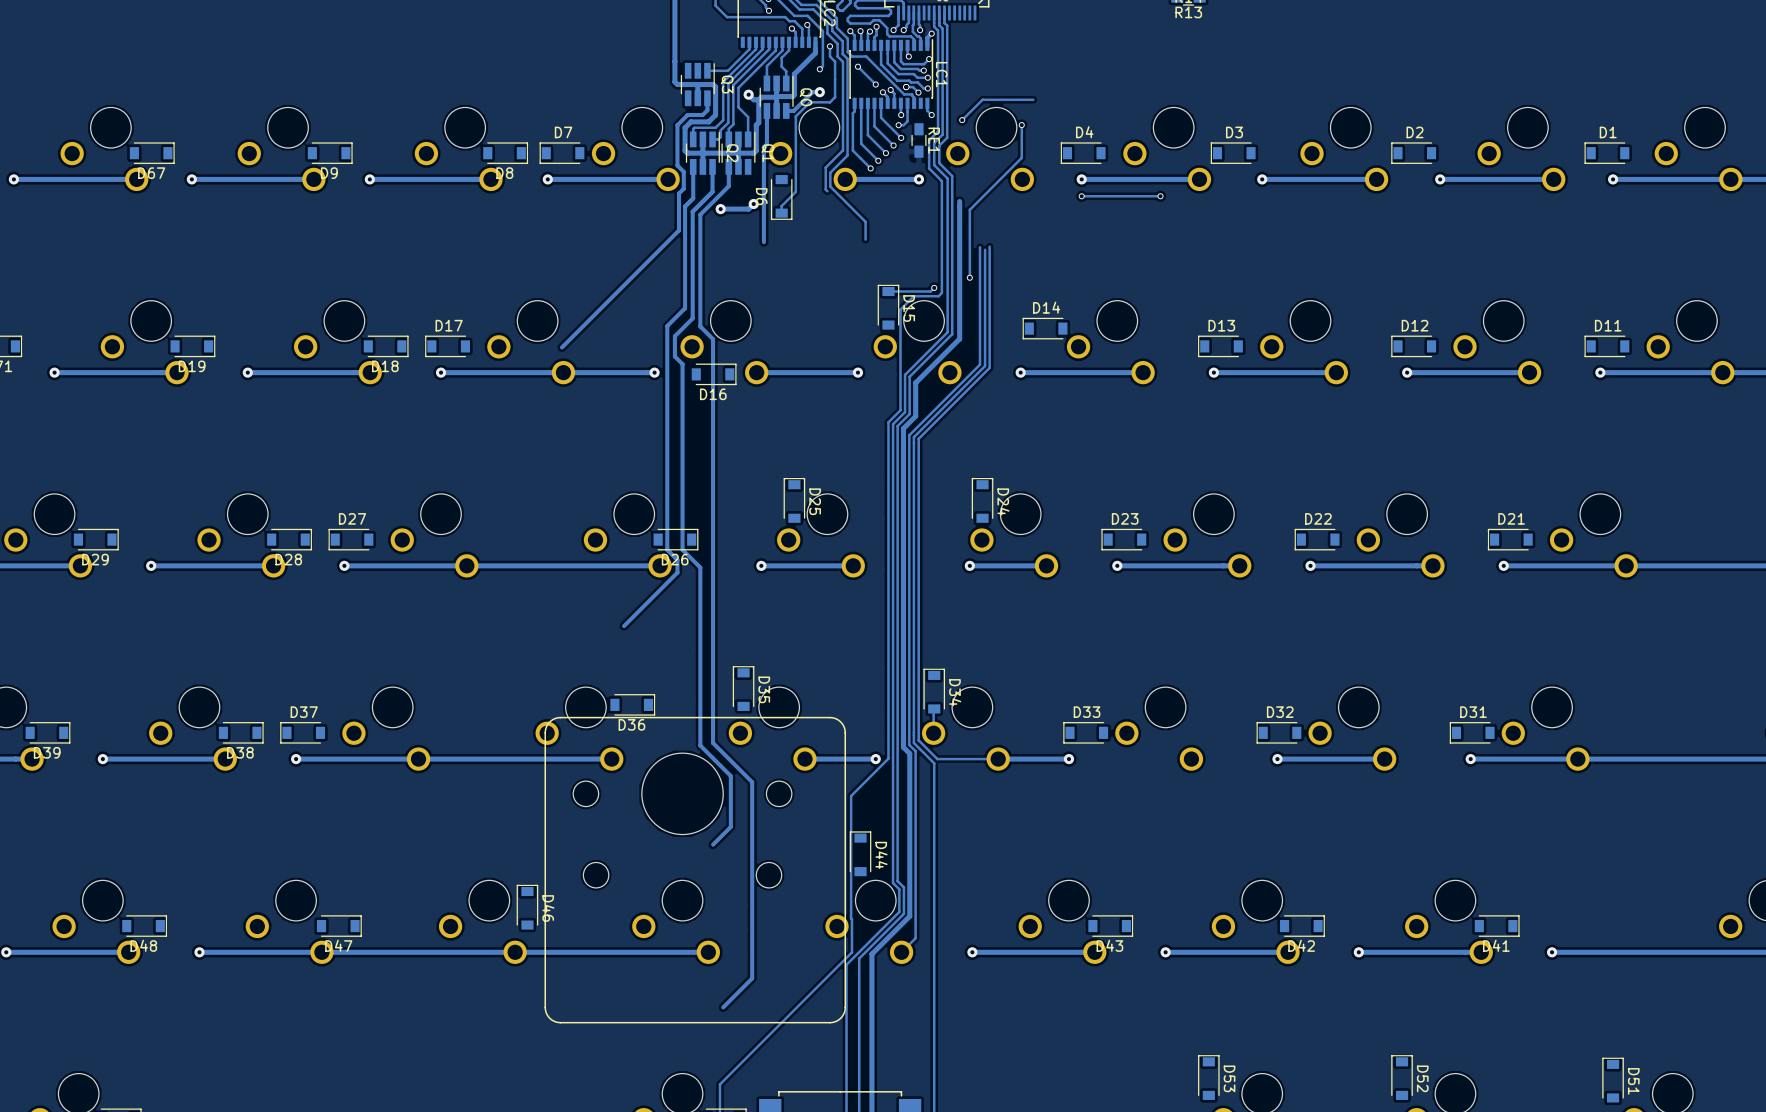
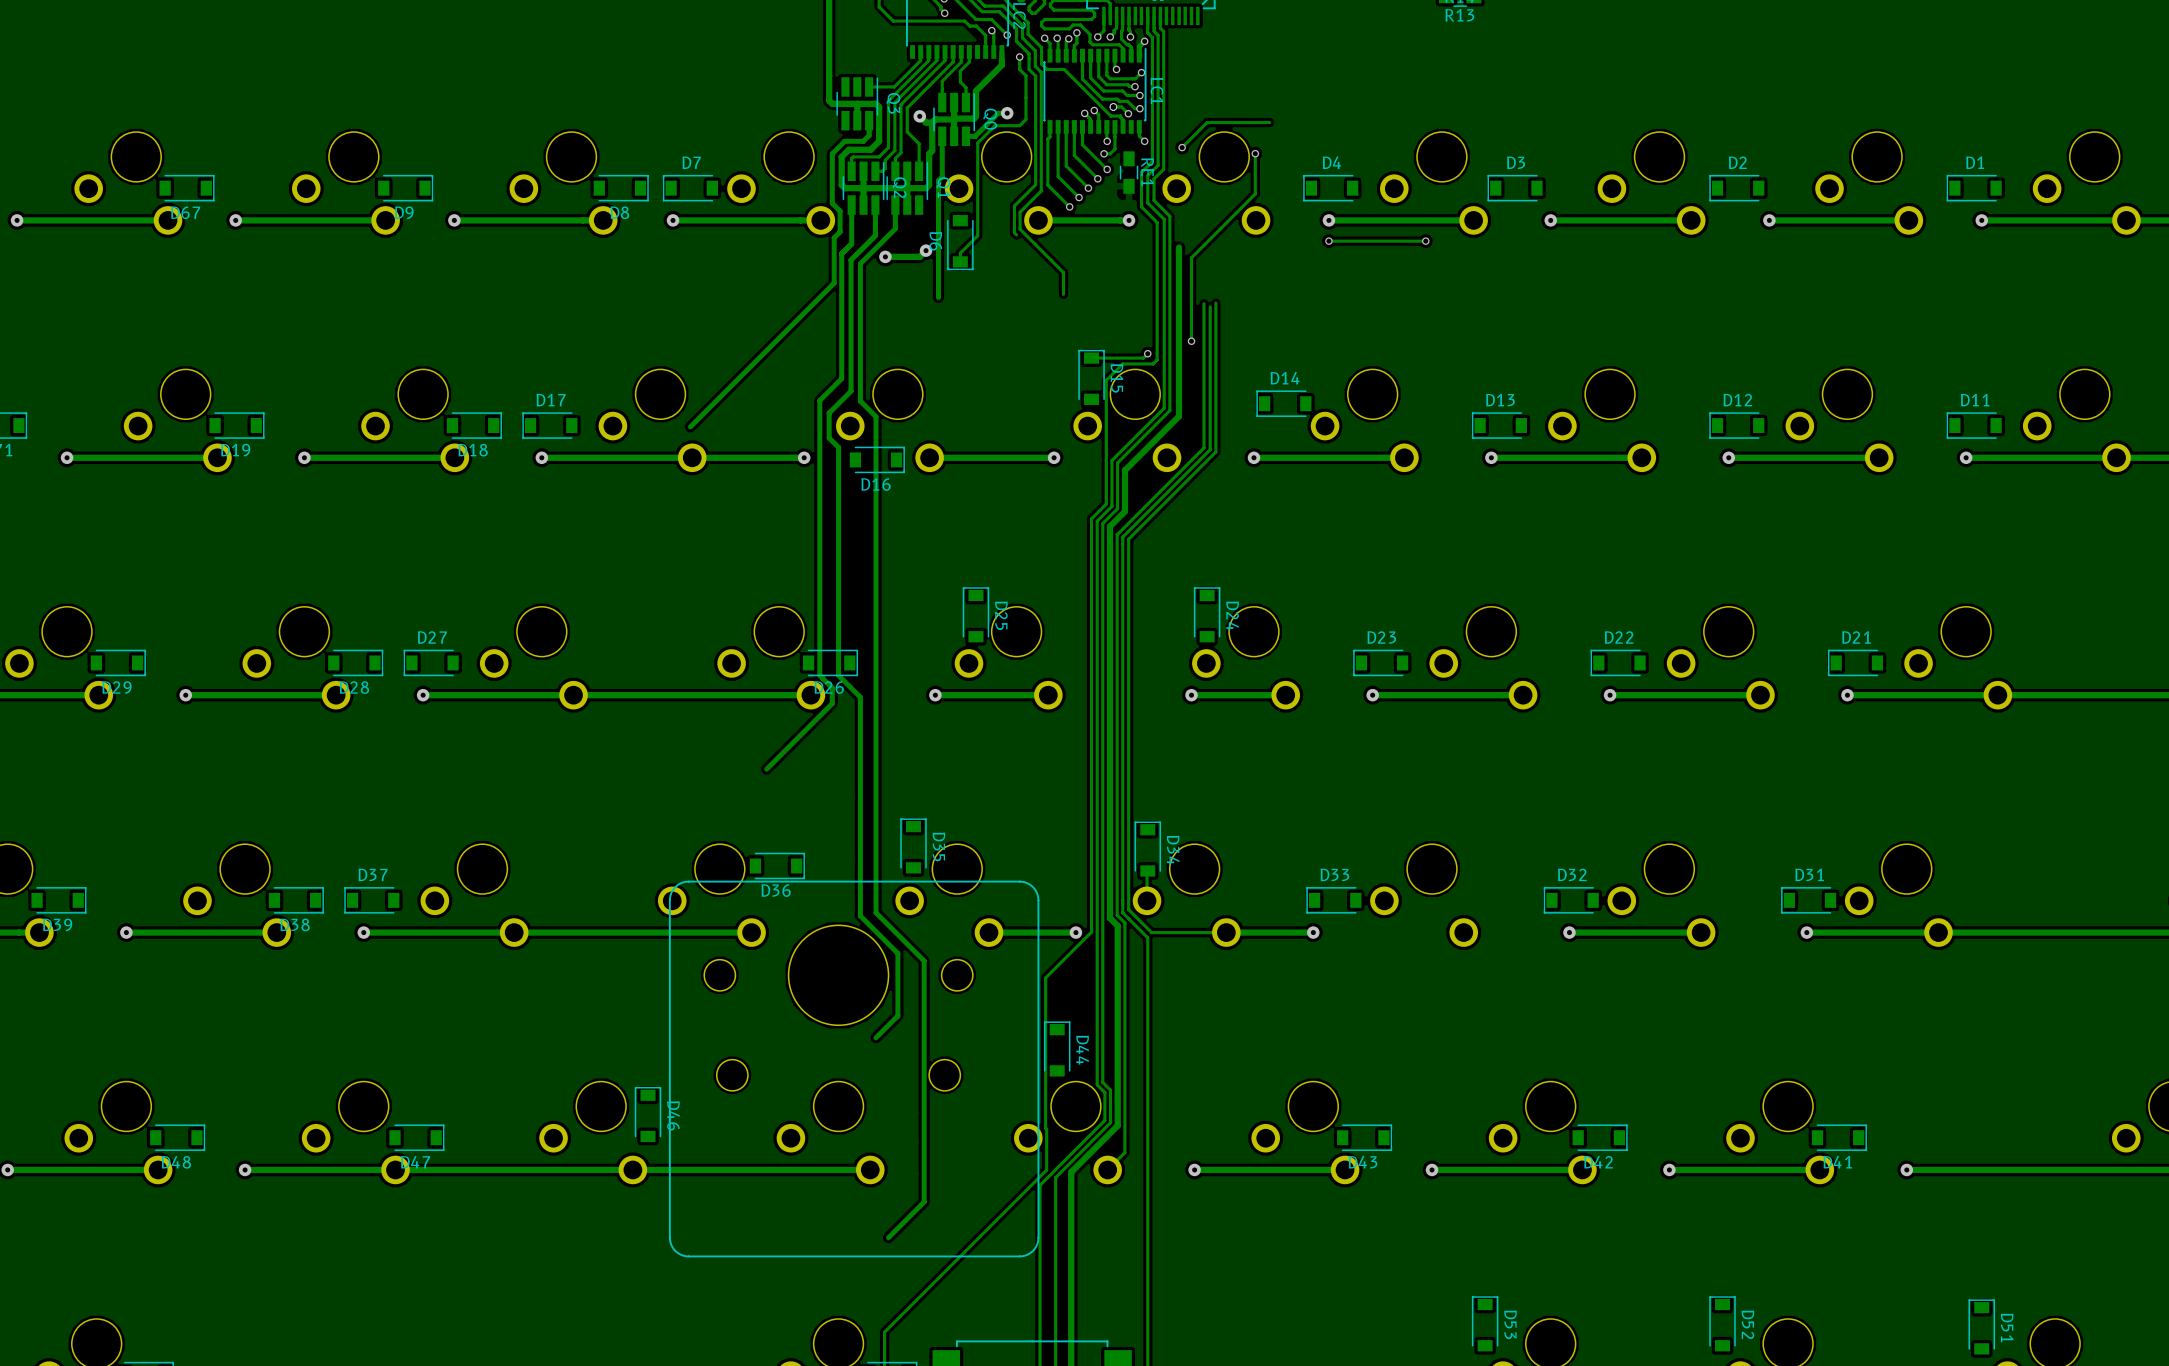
track: (807, 15) (822, 31) (822, 66) (819, 69) -> (991, 19) (1007, 35)
track: (791, 28) (795, 32) (795, 42) -> none
via: (791, 28) -> none
via: none -> (1007, 35)
track: (857, 66) (875, 84) -> none
via: (857, 66) -> none
via: (819, 69) -> none
via: (875, 84) -> none

